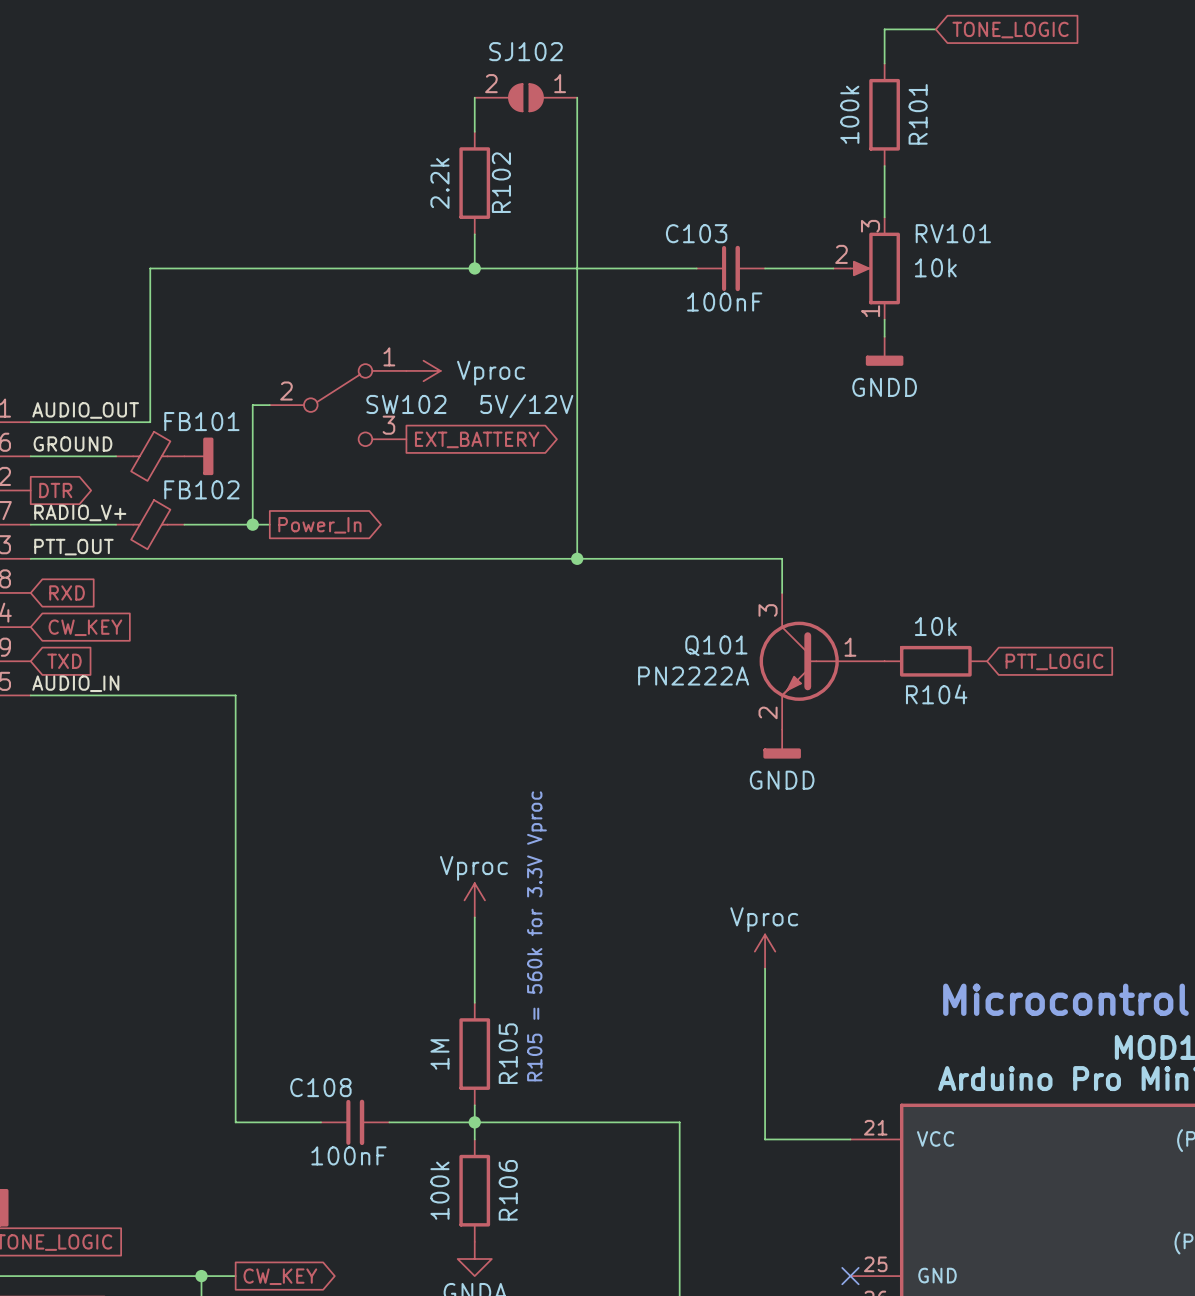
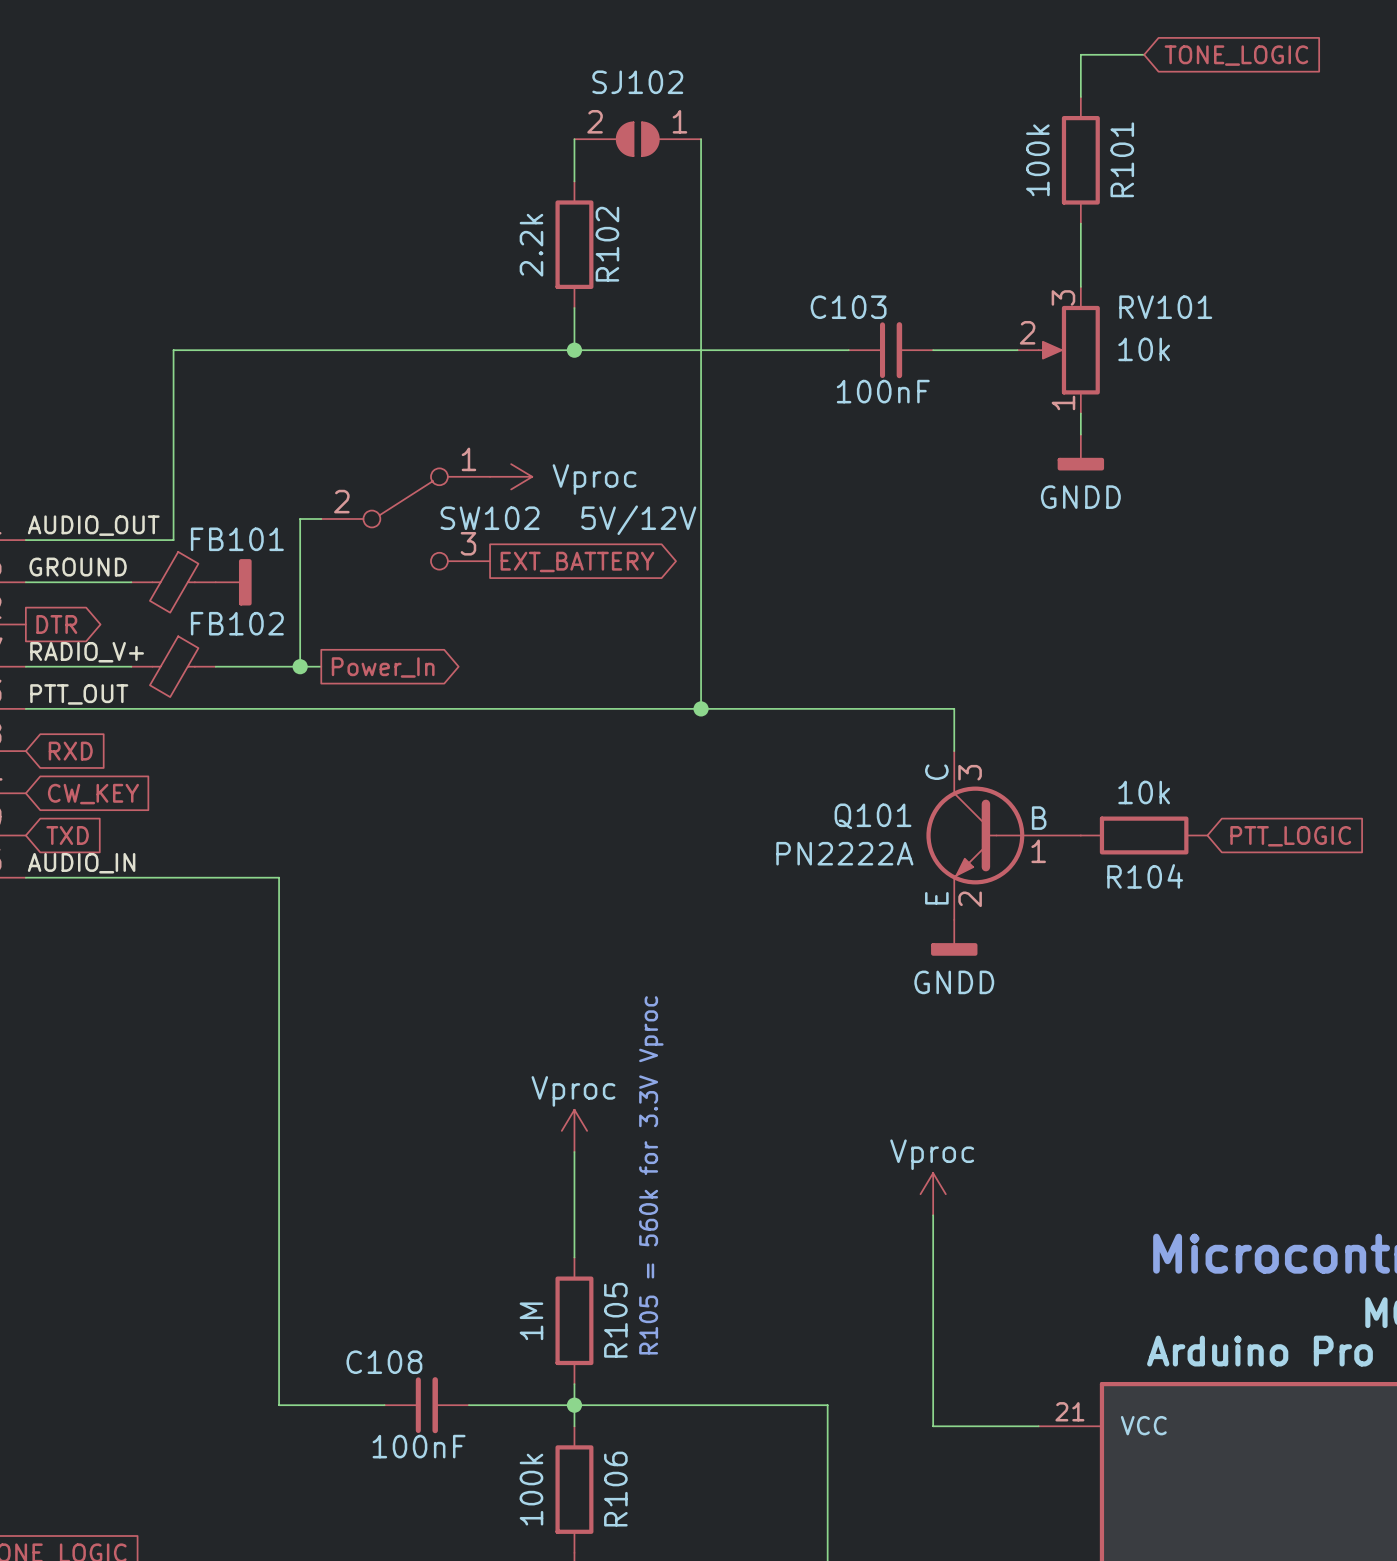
Q101 symbol: [759, 592, 885, 730] -> [926, 751, 1081, 920]

